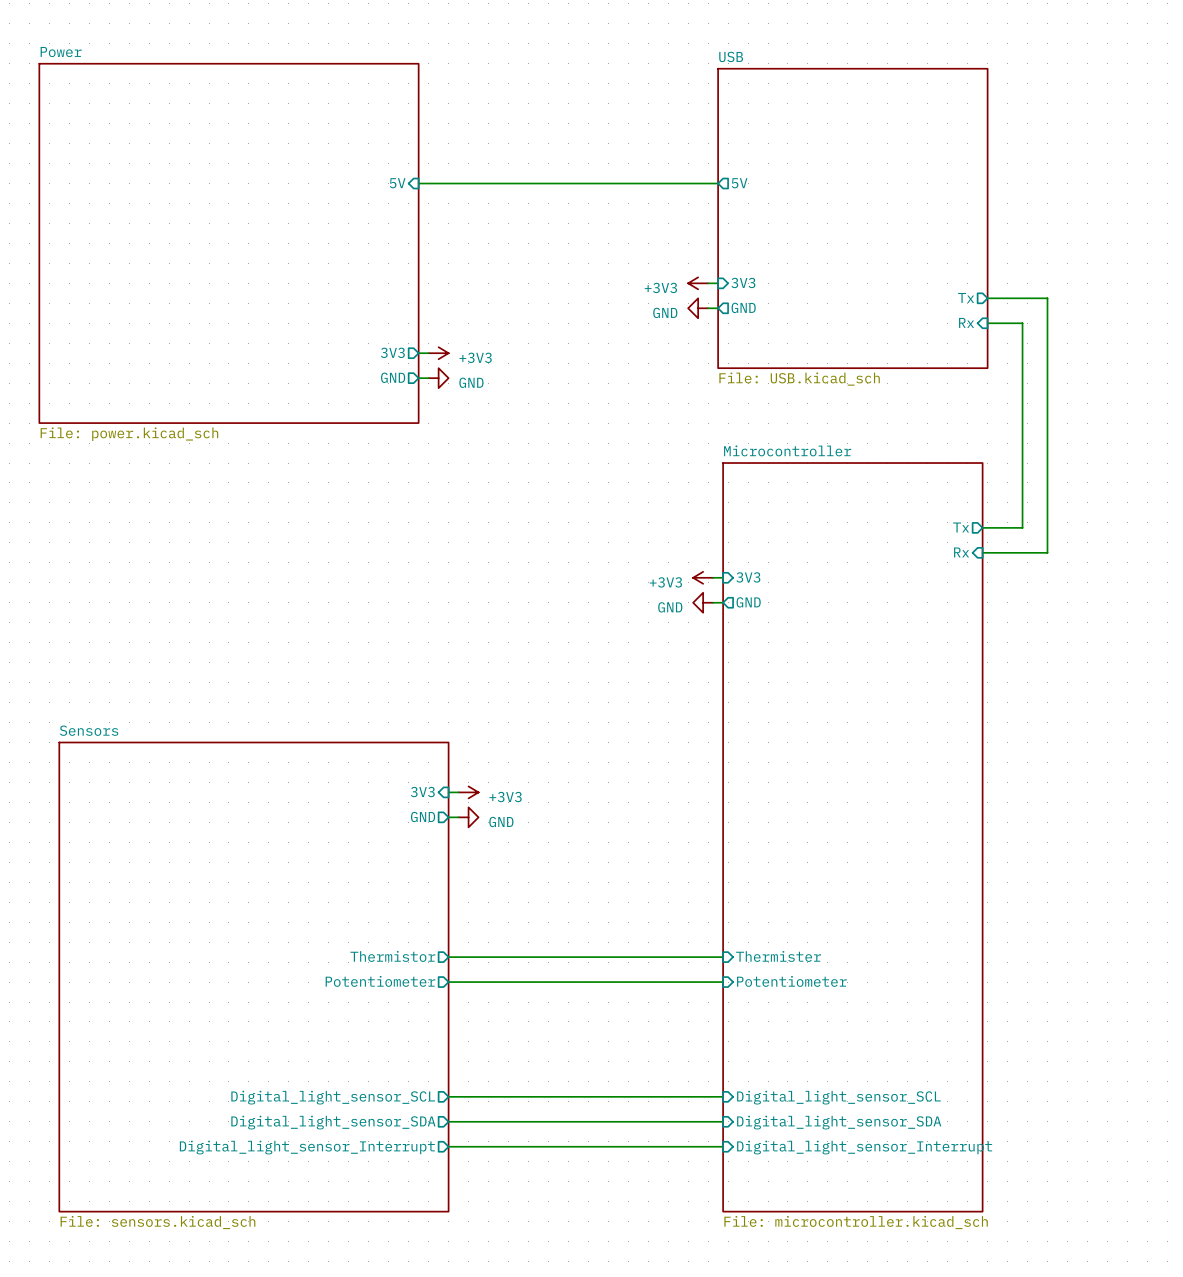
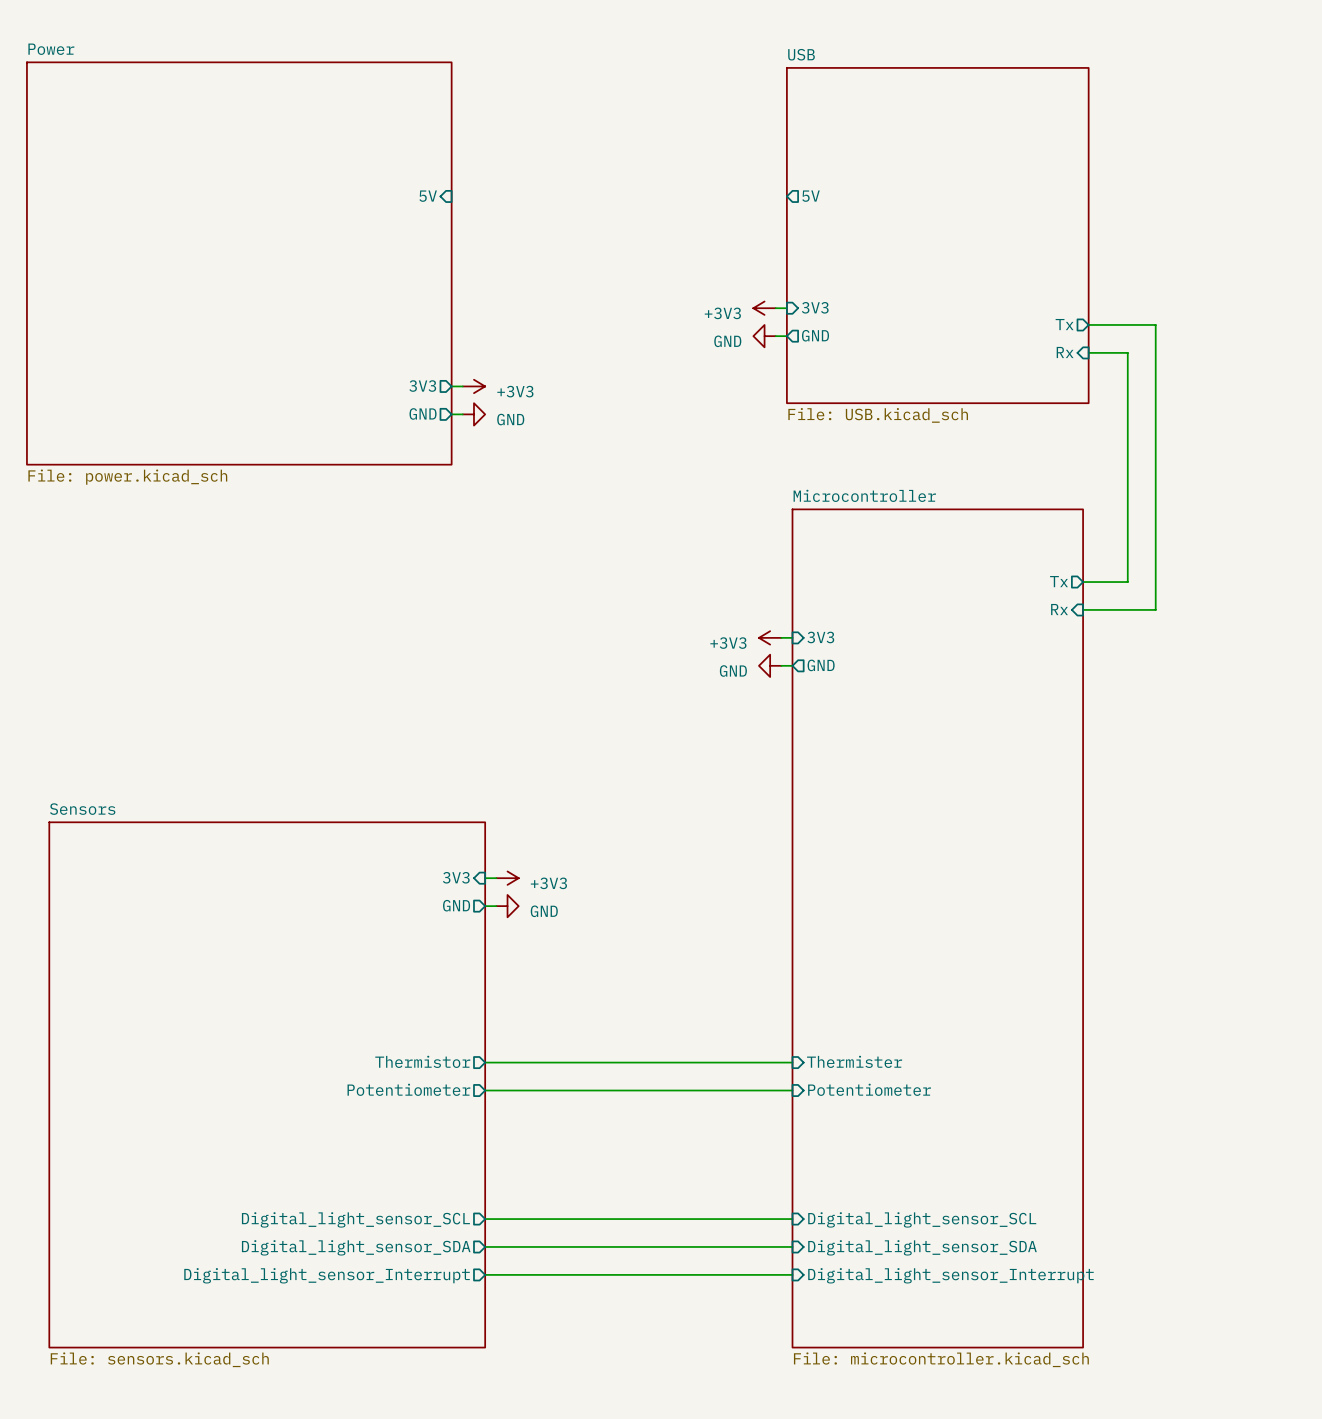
wire: (418, 183) (718, 183) -> none

